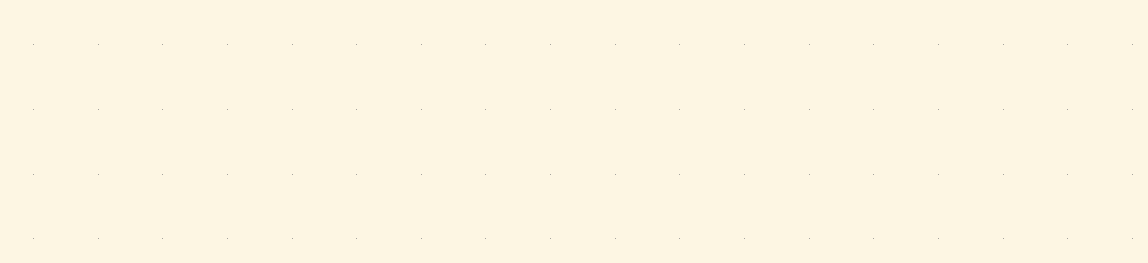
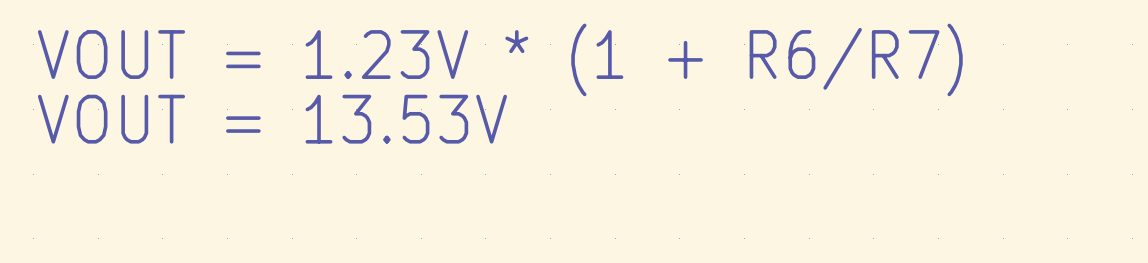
text: none -> VOUT = 1.23V * (1 + R6/R7) (500, 59)
text: none -> VOUT = 13.53V (272, 119)

